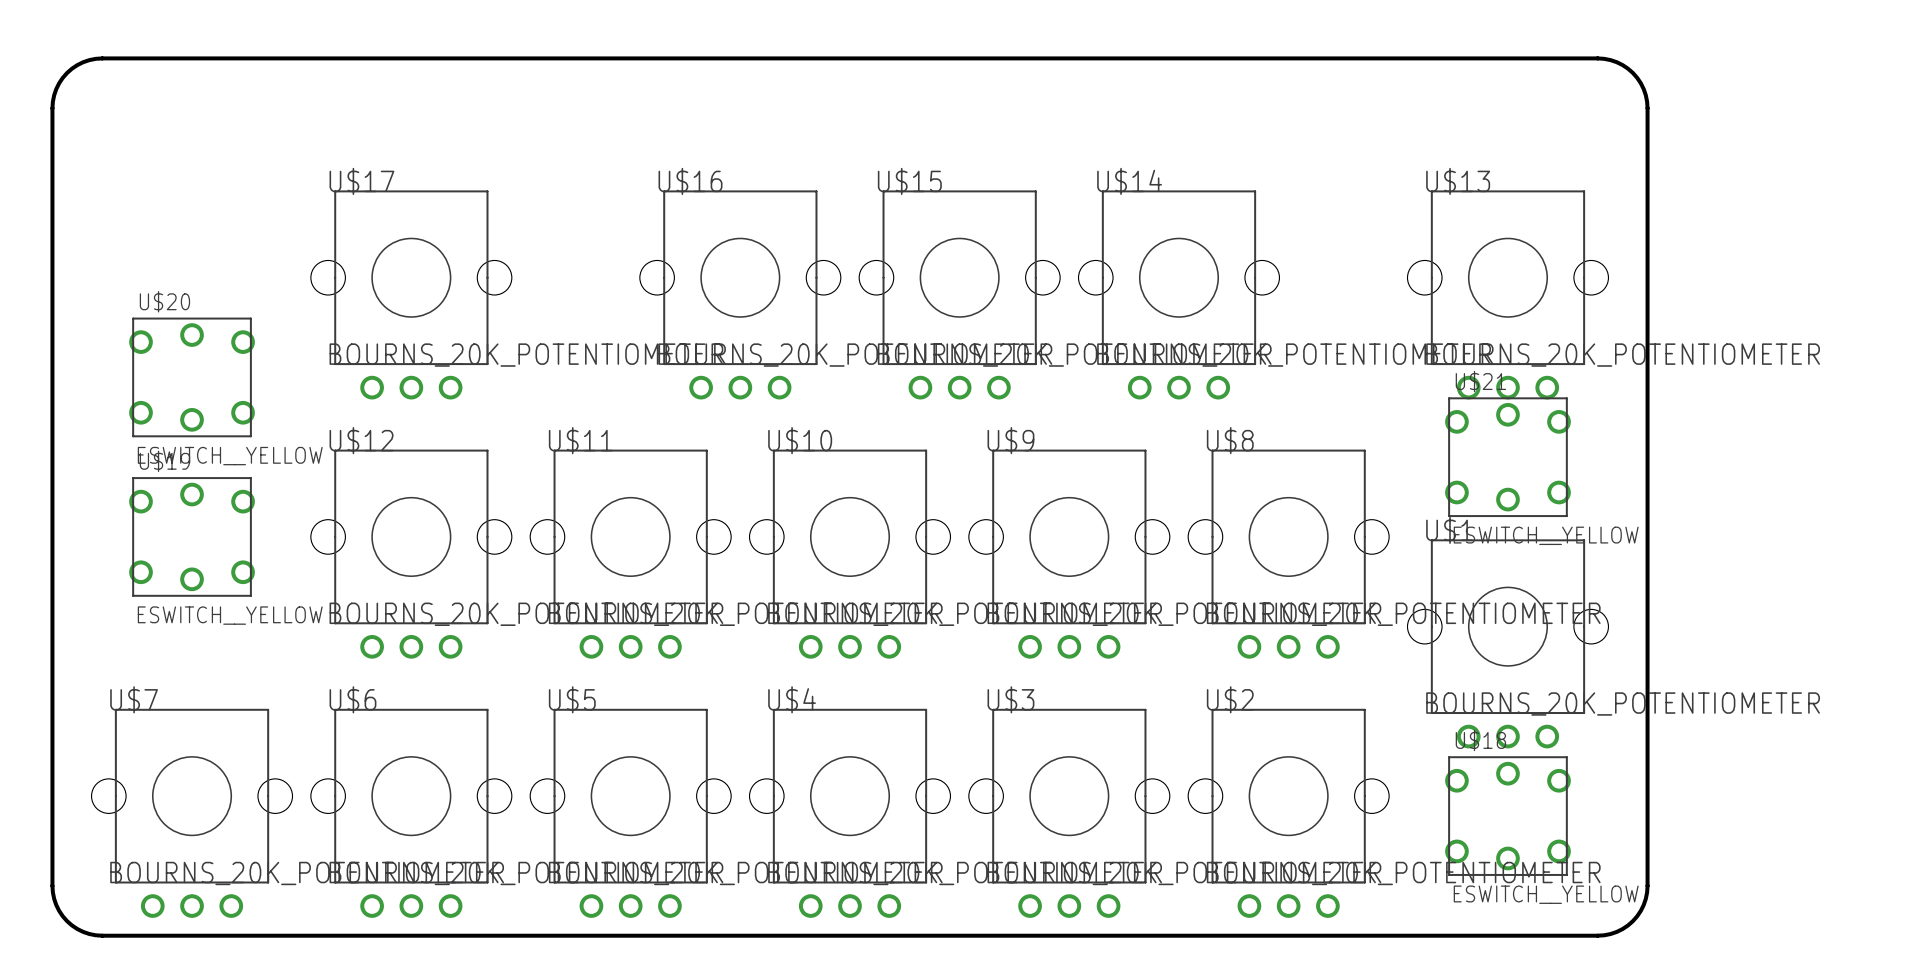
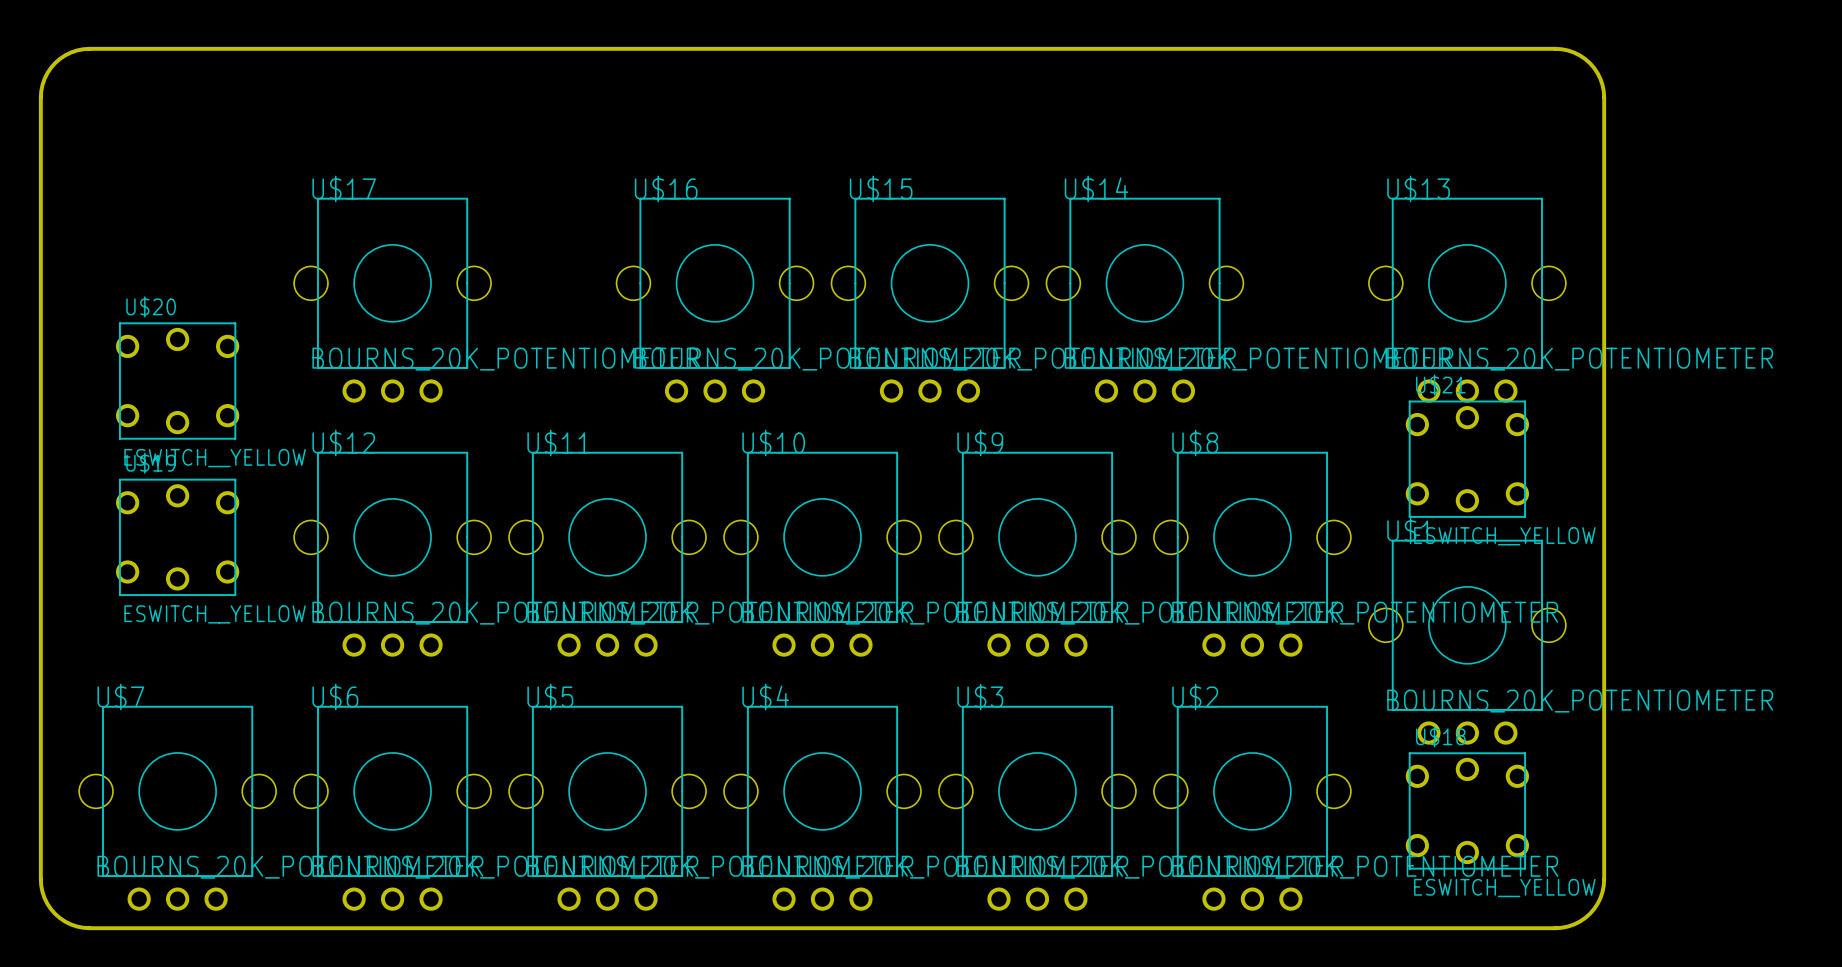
board edge: (52, 108) (56, 89) (67, 73) (83, 62) (102, 58) (1597, 58) (1616, 62) (1632, 73) (1643, 89) (1647, 108) -> (40, 117) (42, 85) (50, 67) (59, 58) (70, 52) (89, 48) (1555, 48) (1574, 52) (1585, 58) (1594, 67) (1602, 85) (1604, 117)

